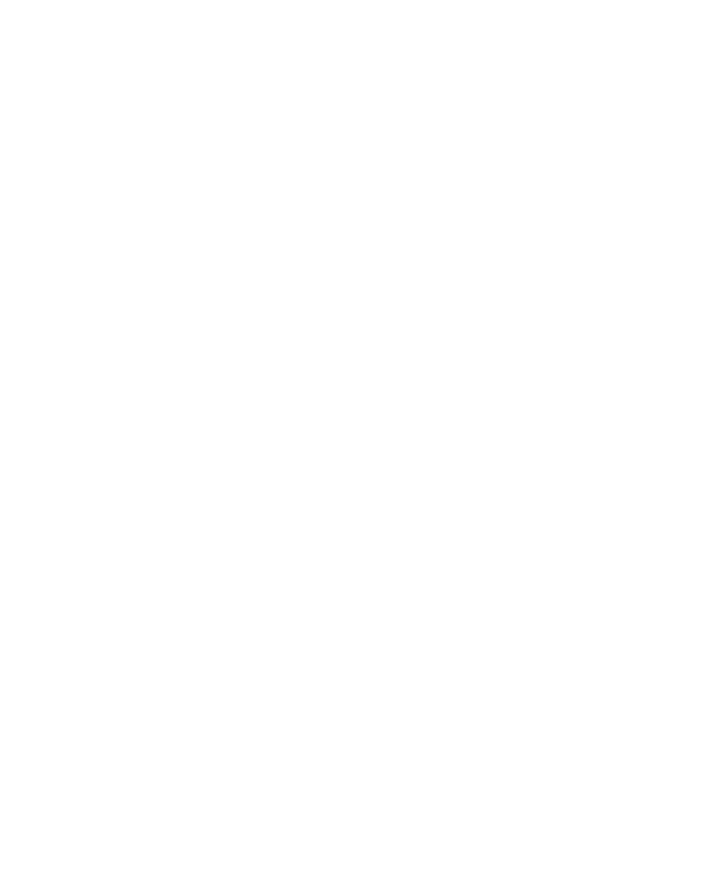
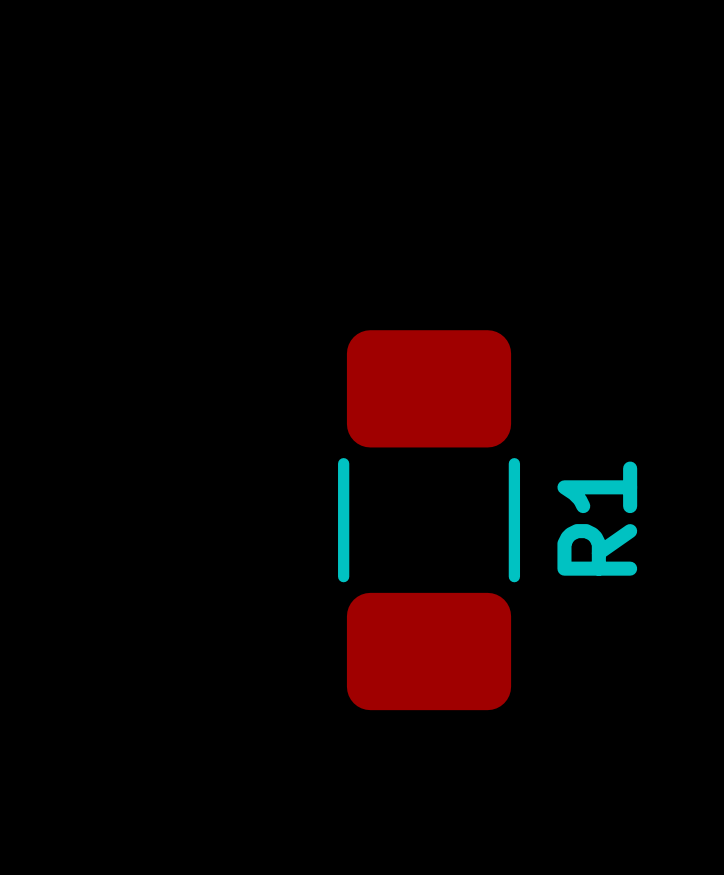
R1: none -> (429, 520)

